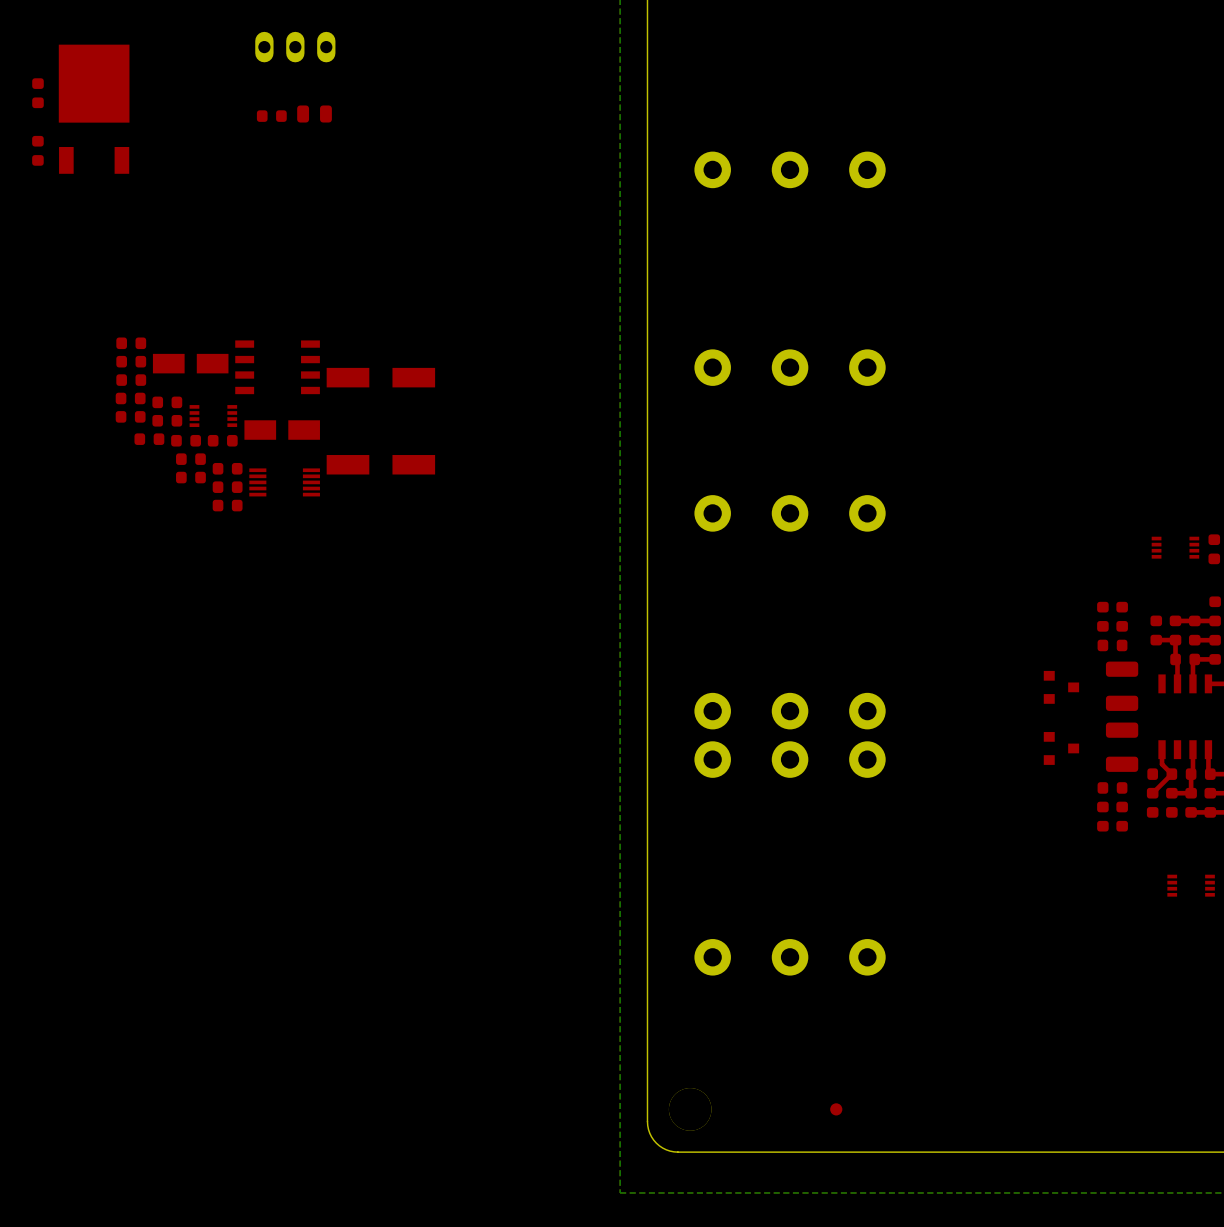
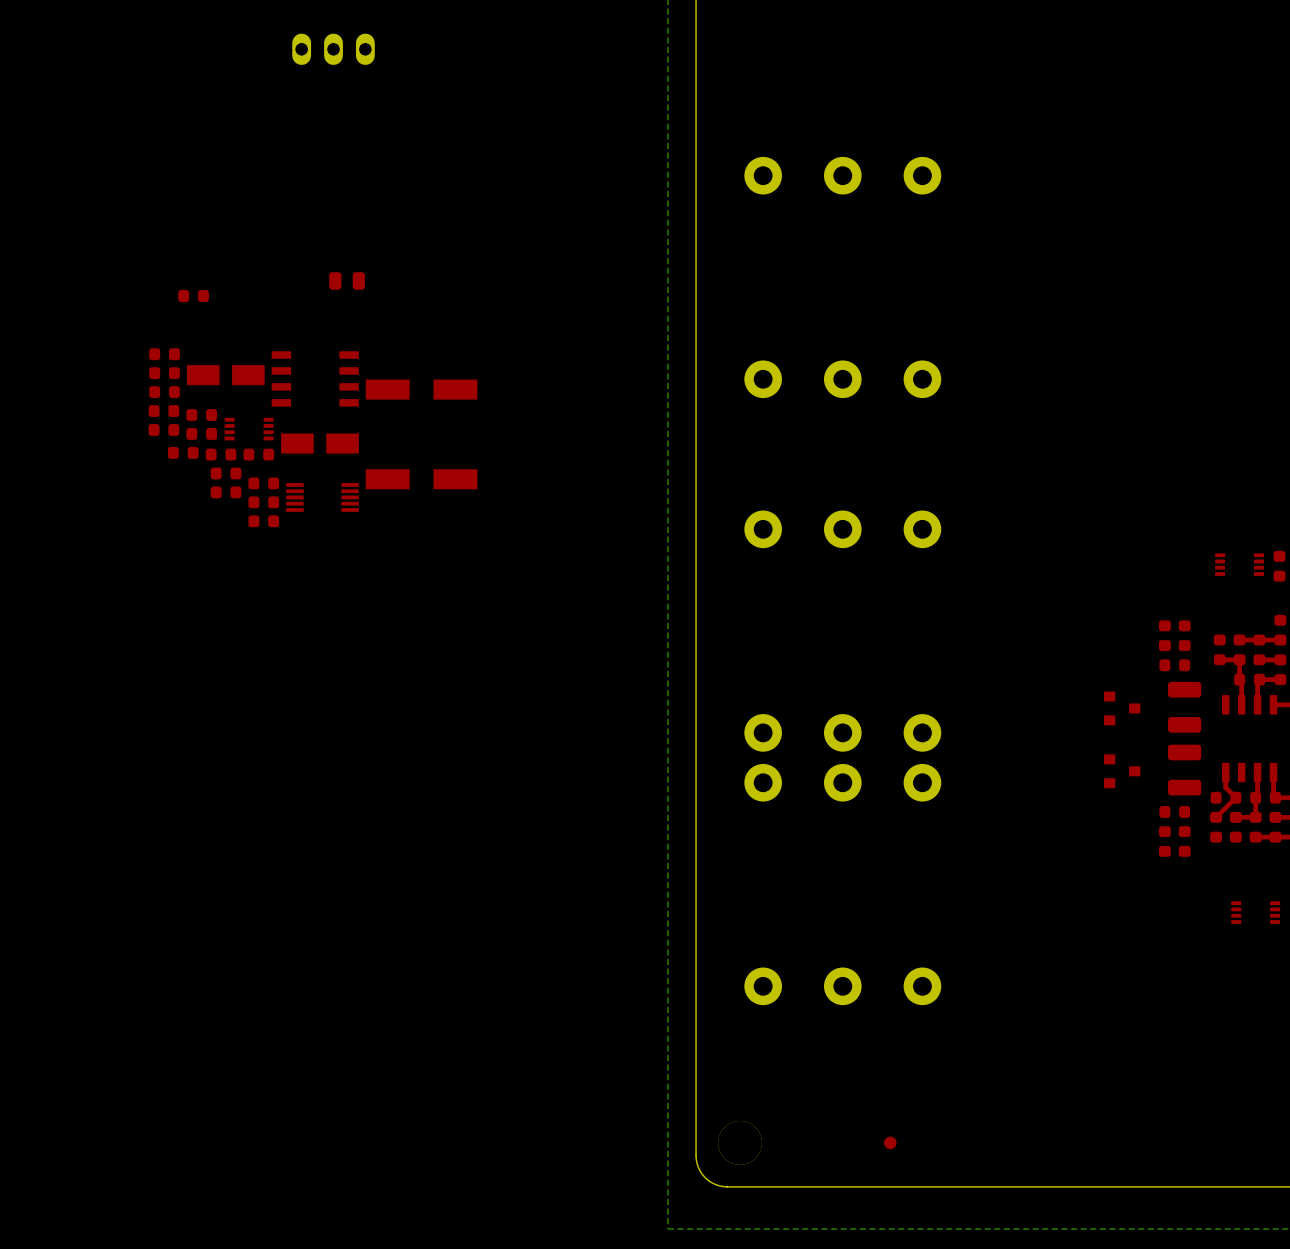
part: (37, 93) -> none
part: (94, 109) -> none
part position: (314, 113) -> (347, 280)
part: (271, 116) -> none
part: (37, 150) -> none
part: none -> (193, 296)

